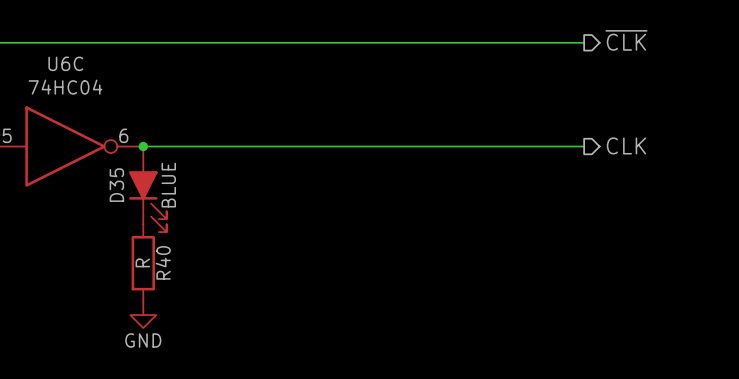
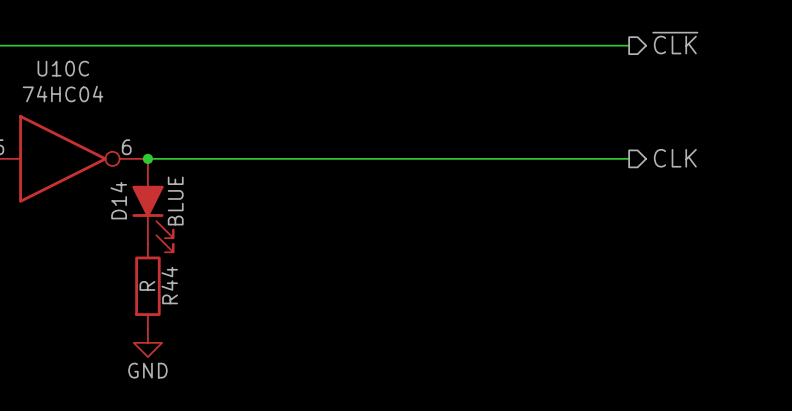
U6C name: U6C (65, 63) -> U10C (63, 68)
D35 name: D35 (116, 185) -> D14 (118, 200)
R40 name: R40 (163, 262) -> R44 (169, 285)

